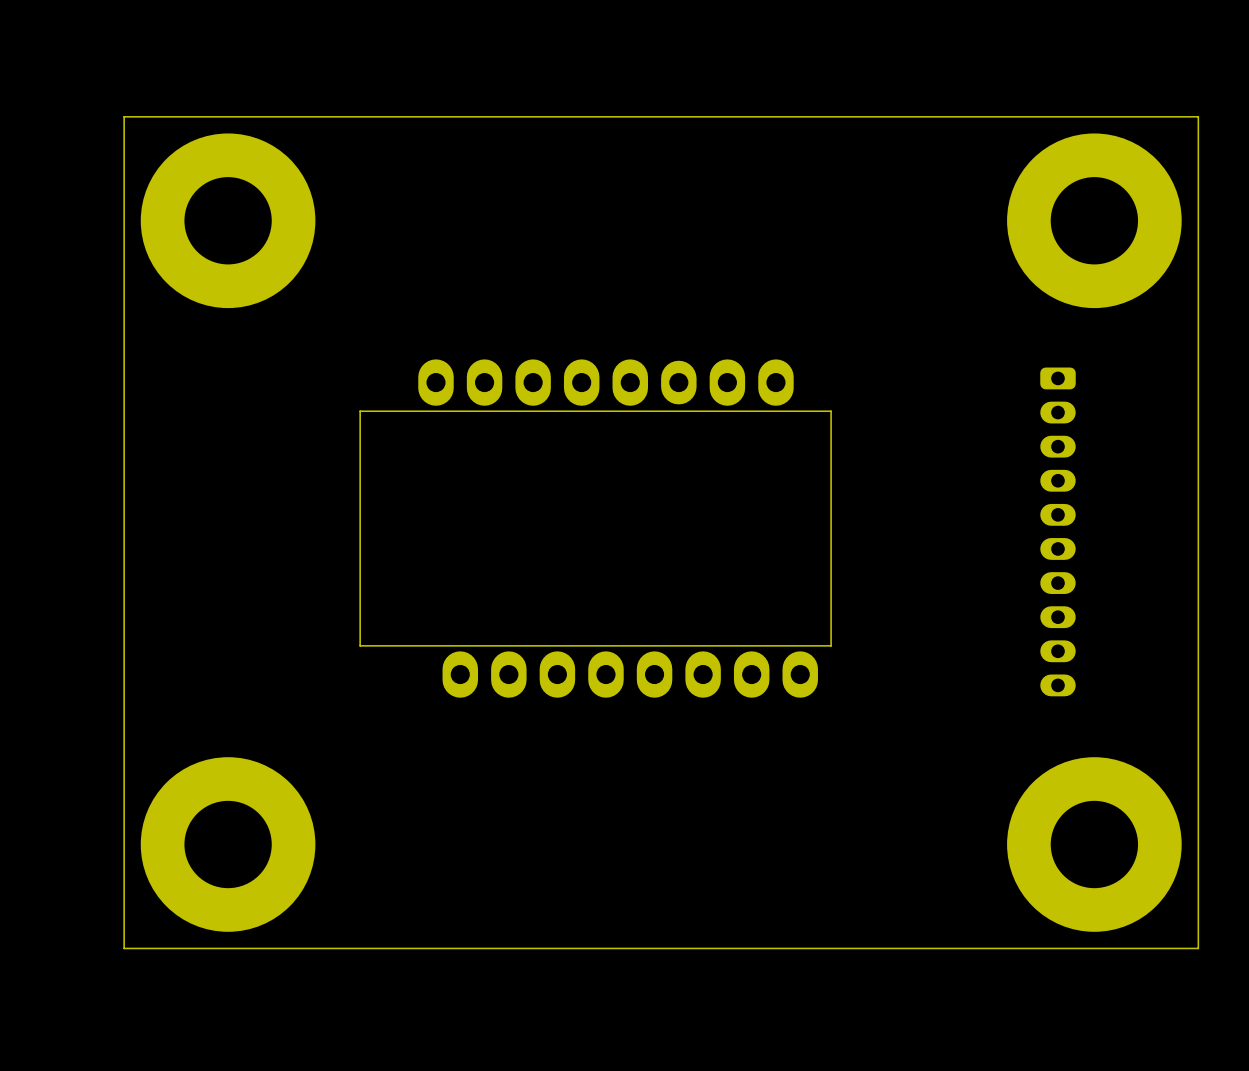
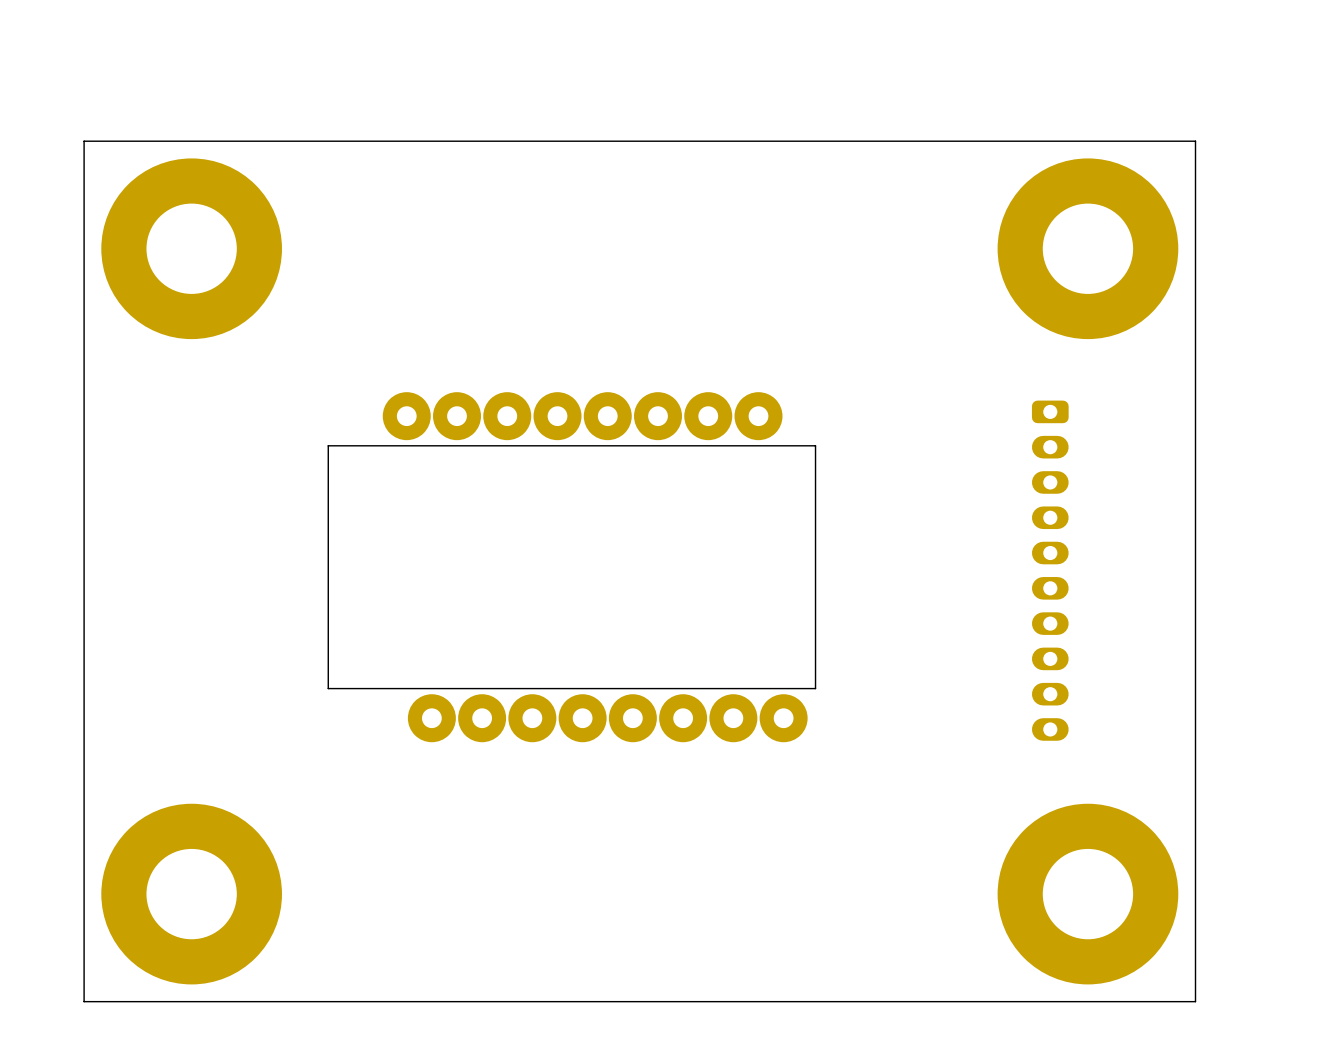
part footprint: [359, 359, 832, 698] -> [327, 392, 817, 743]

